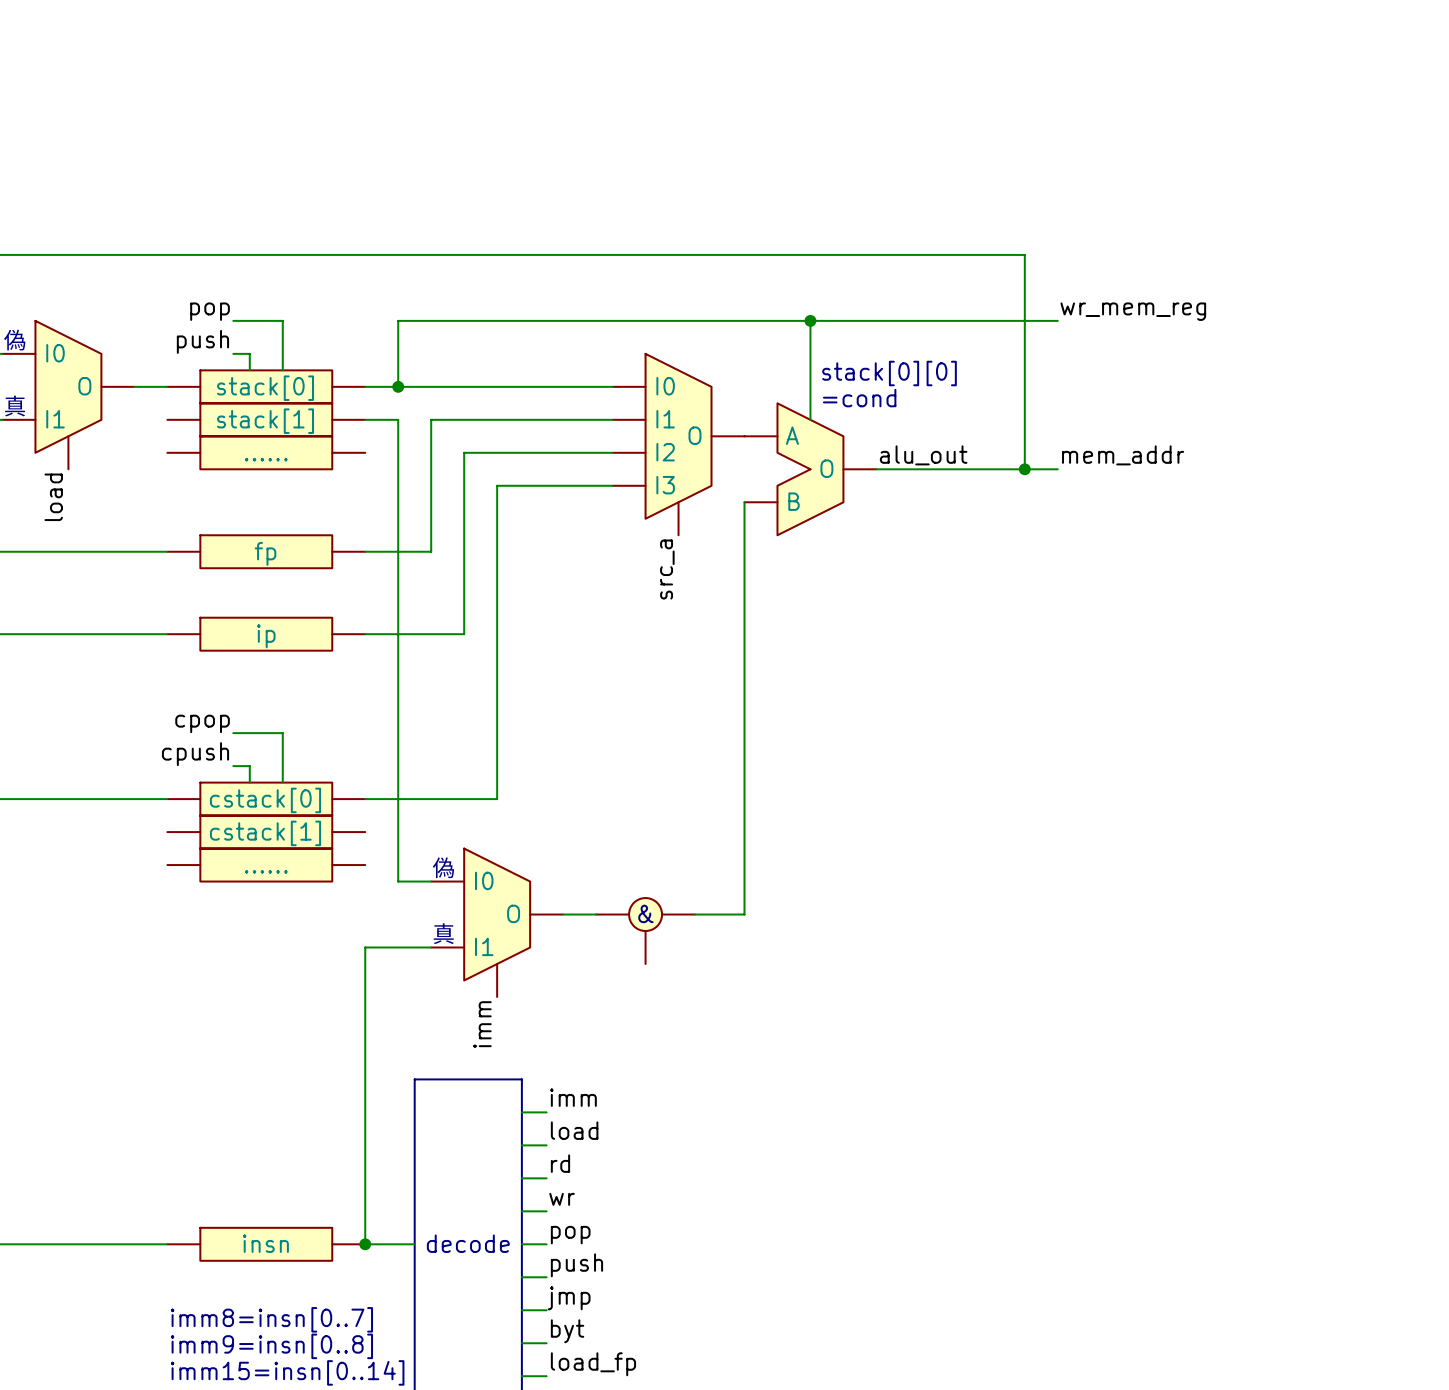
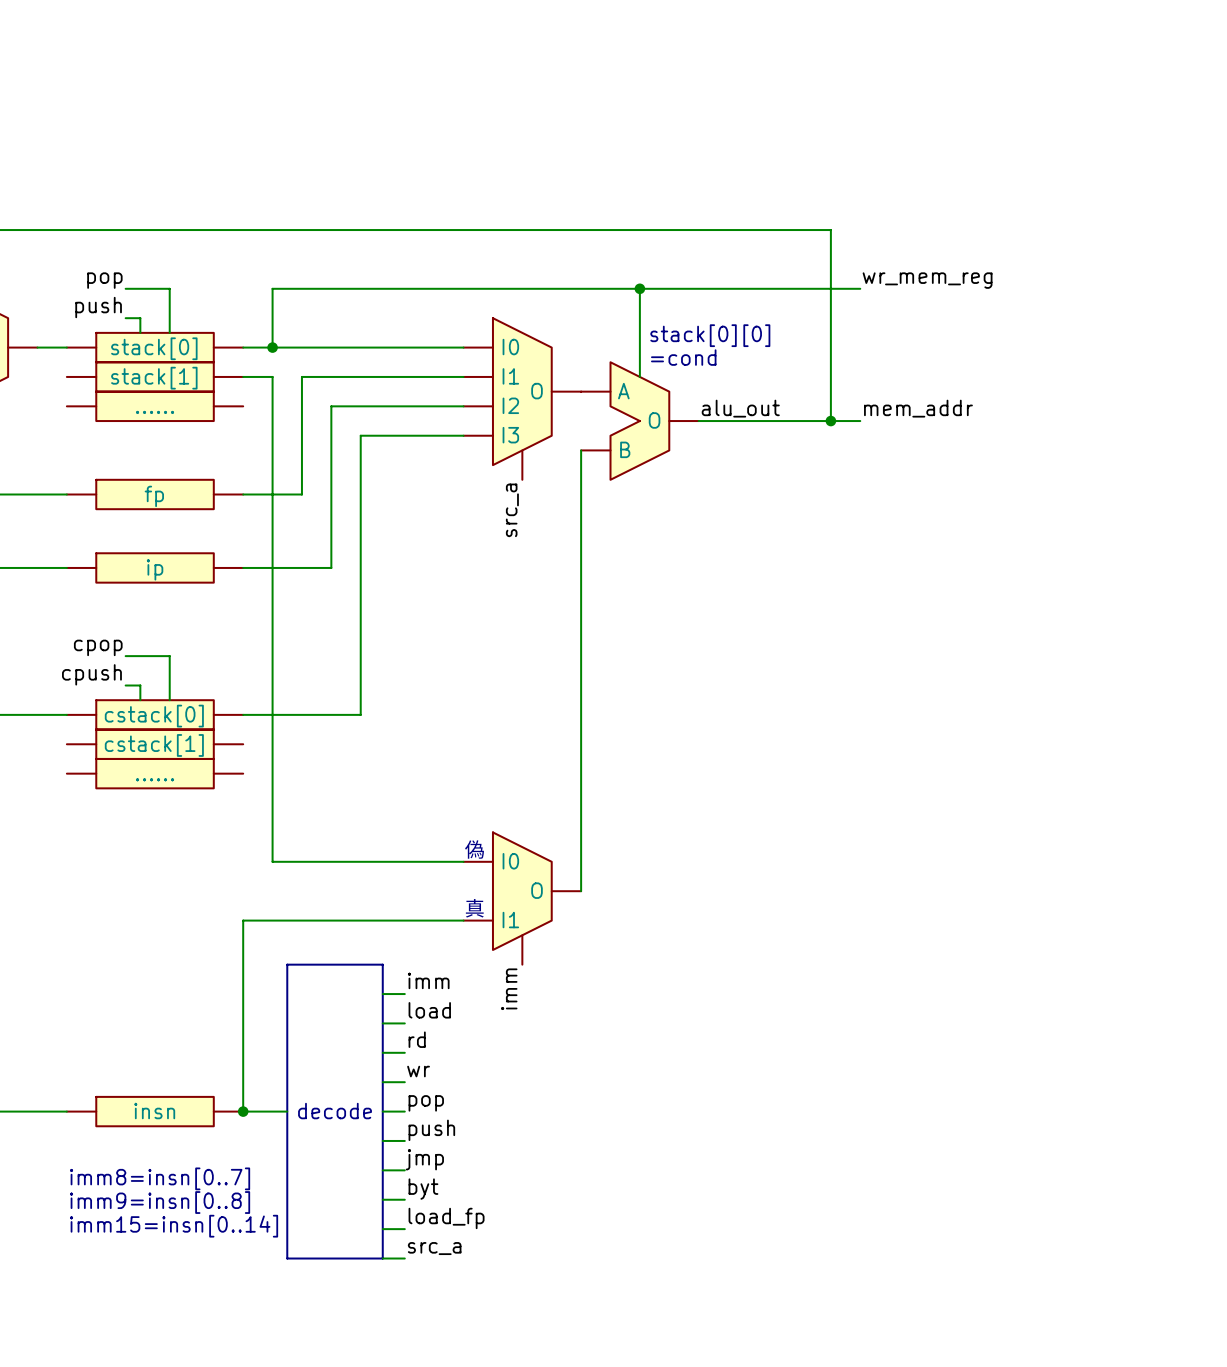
text position: 偽 (443, 867) -> 偽 (474, 849)
wire: (398, 881) (431, 881) -> (272, 788) (272, 861) (463, 861)
text: & (645, 913) -> none
wire: (563, 914) (596, 914) -> none
wire: (695, 914) (744, 914) -> (581, 891) (581, 817)
part position: (497, 922) -> (522, 898)
part: (645, 931) -> none
text position: 真 (443, 933) -> 真 (474, 908)
wire: (431, 947) (365, 947) (365, 1029) -> (463, 920) (243, 920)
label position: imm (482, 1024) -> imm (509, 989)

